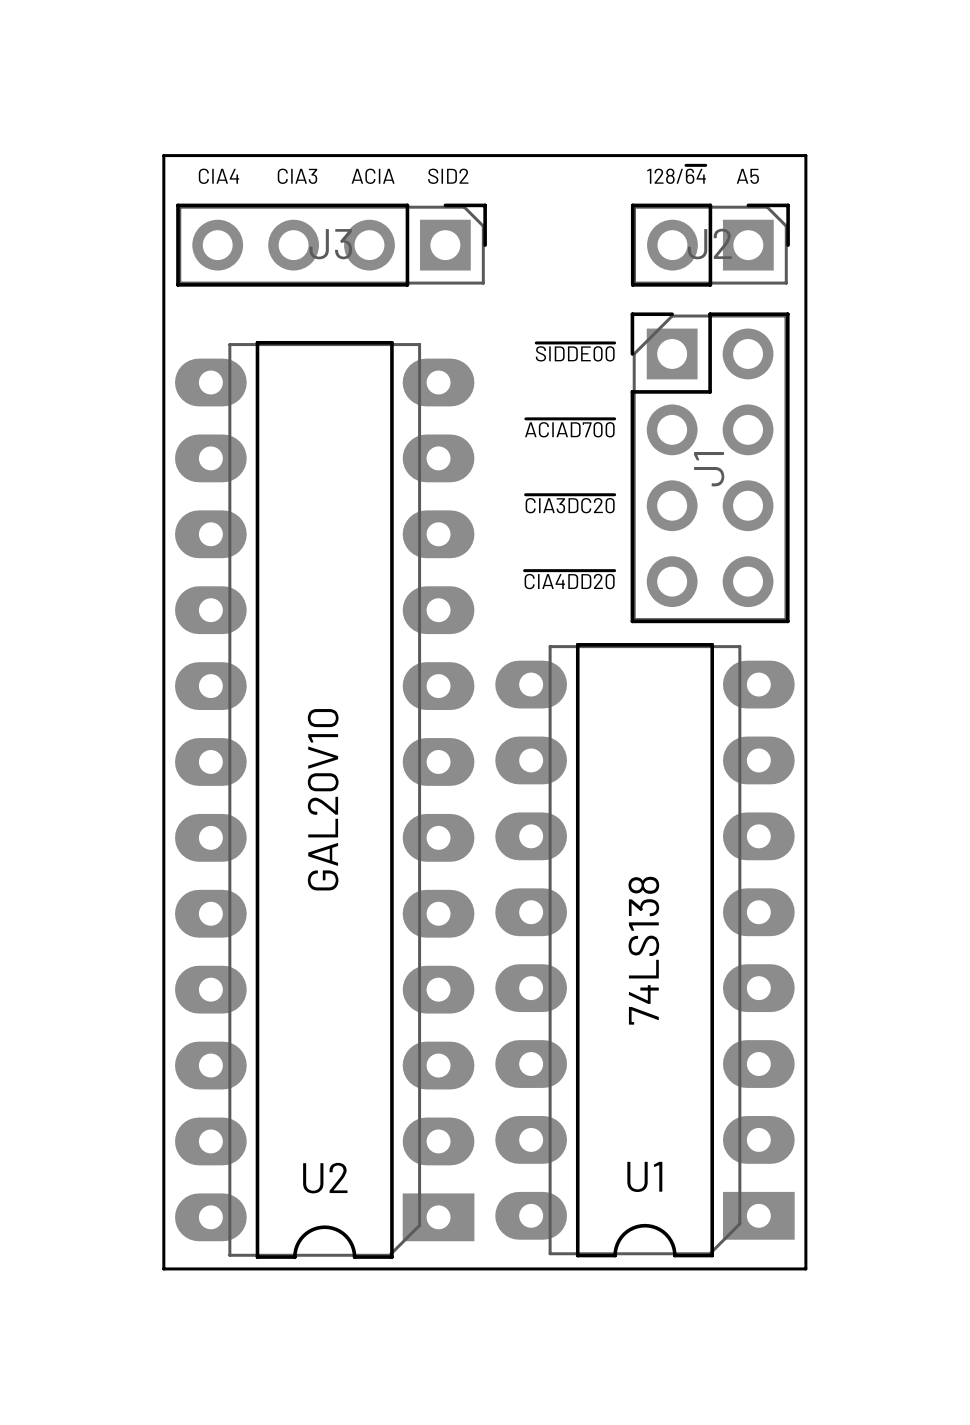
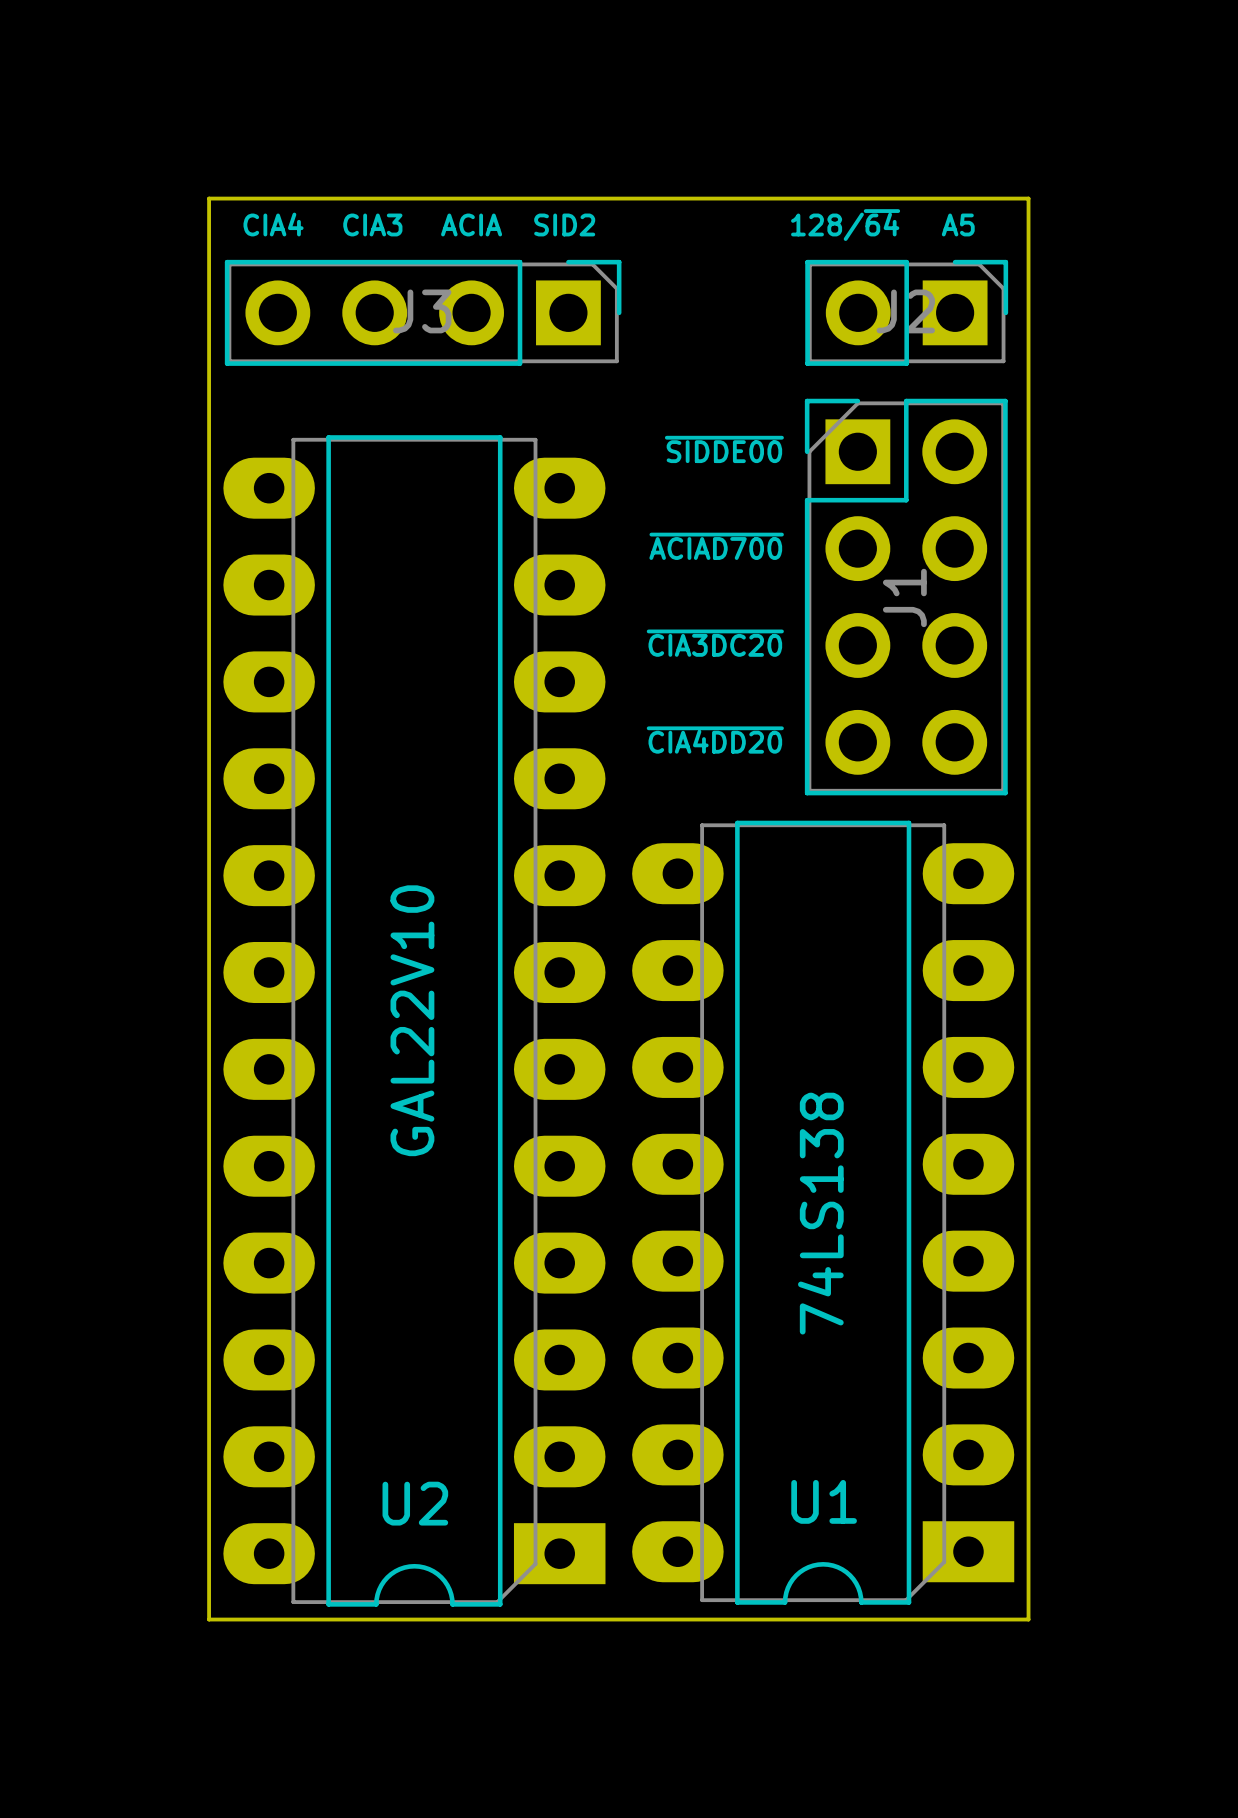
U2 value: GAL20V10 (323, 799) -> GAL22V10 (412, 1020)

